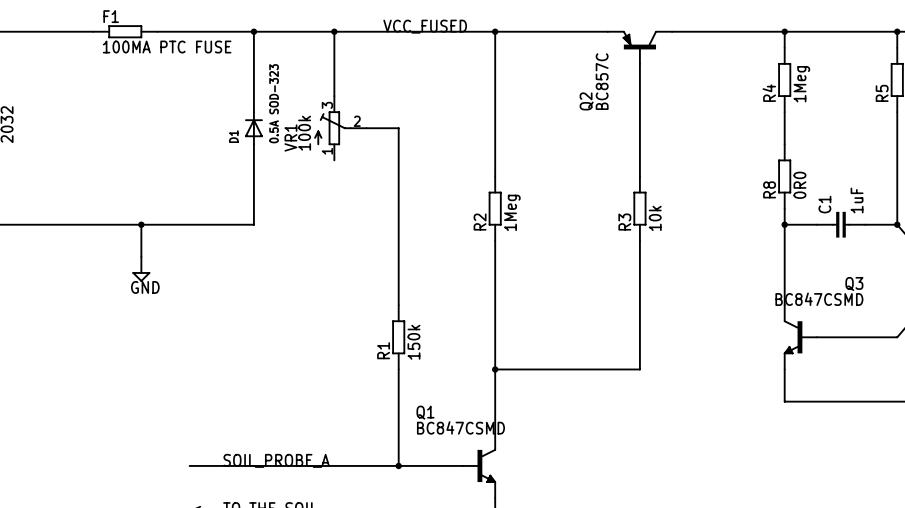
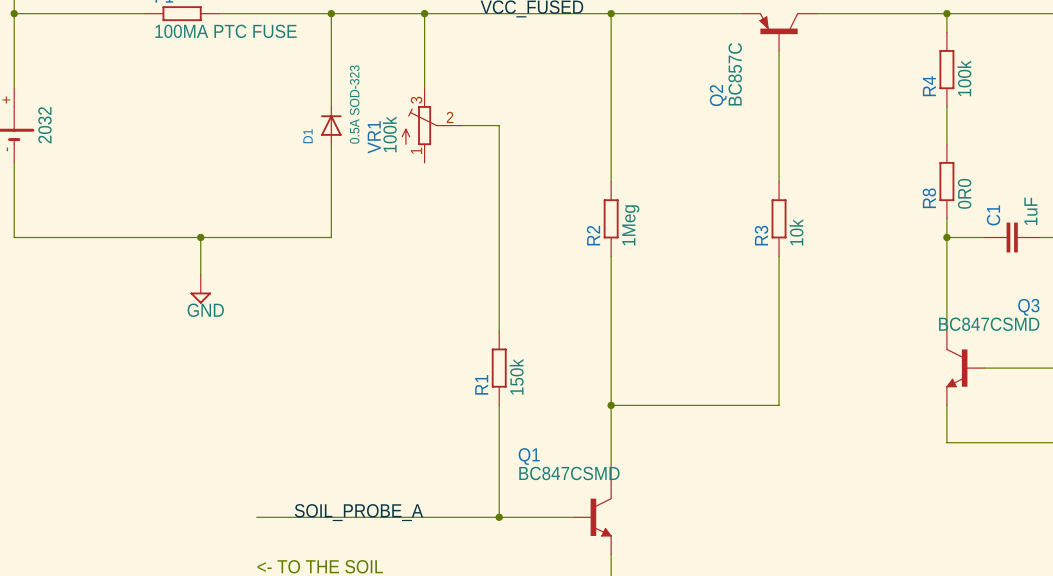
R4 value: 1Meg (801, 84) -> 100k (964, 78)

